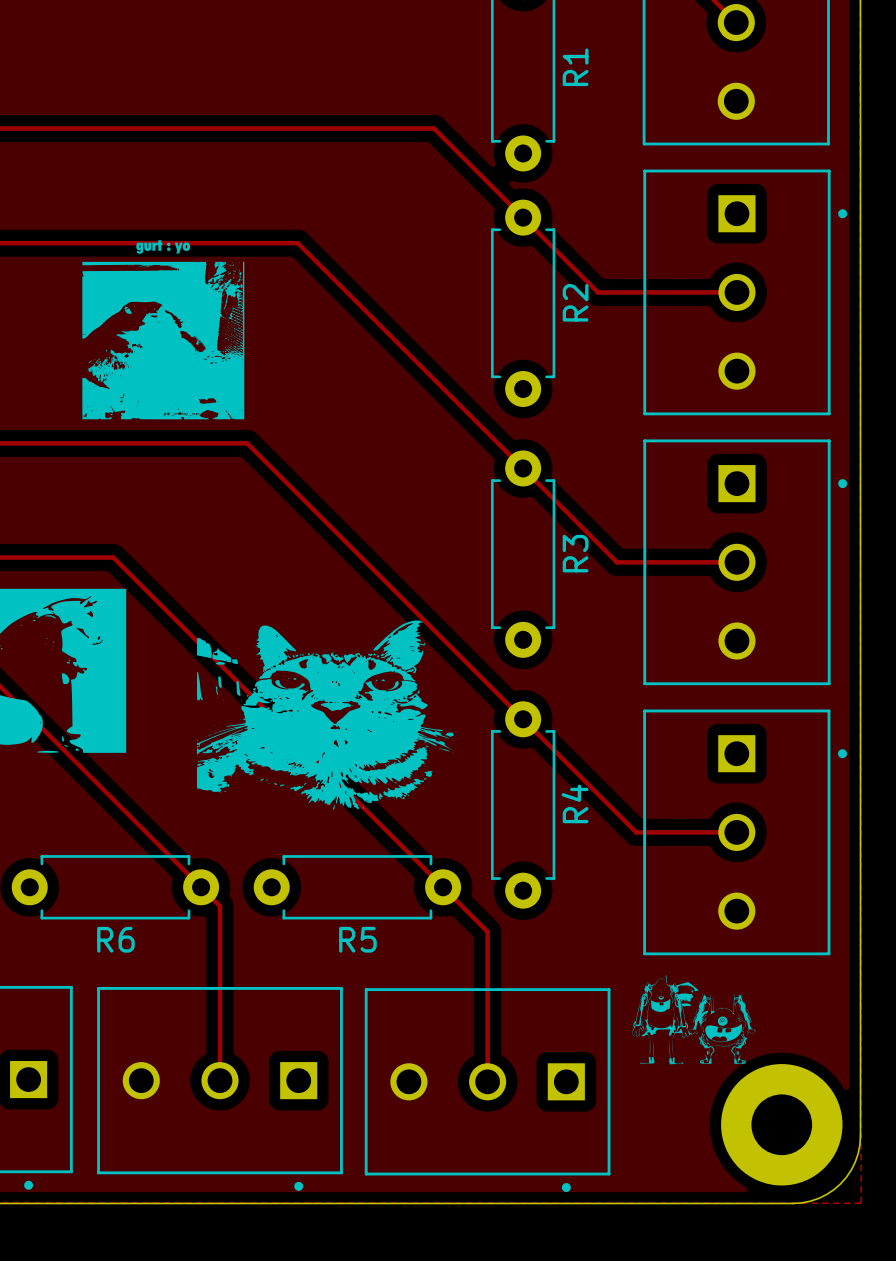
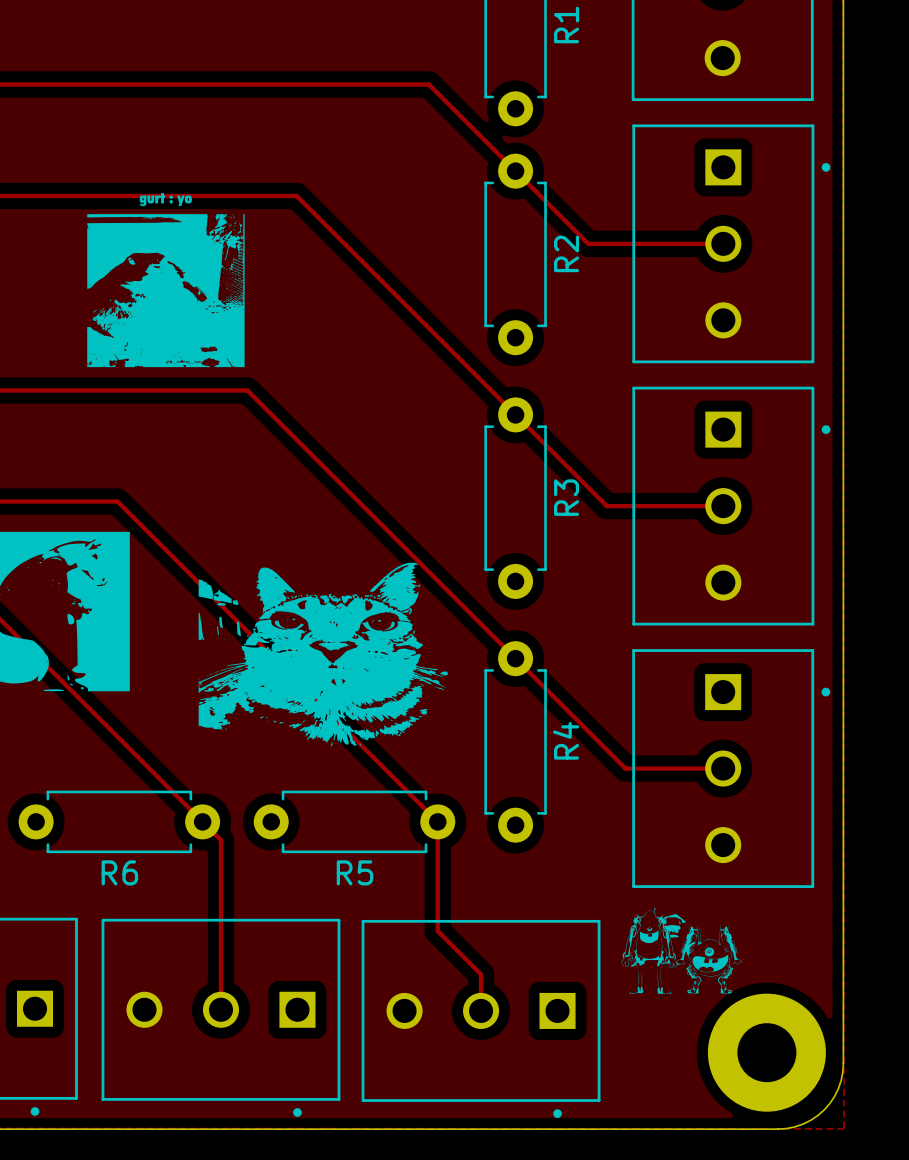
track: (443, 887) (487, 931) (487, 1044) -> (437, 821) (437, 931) (481, 974)

